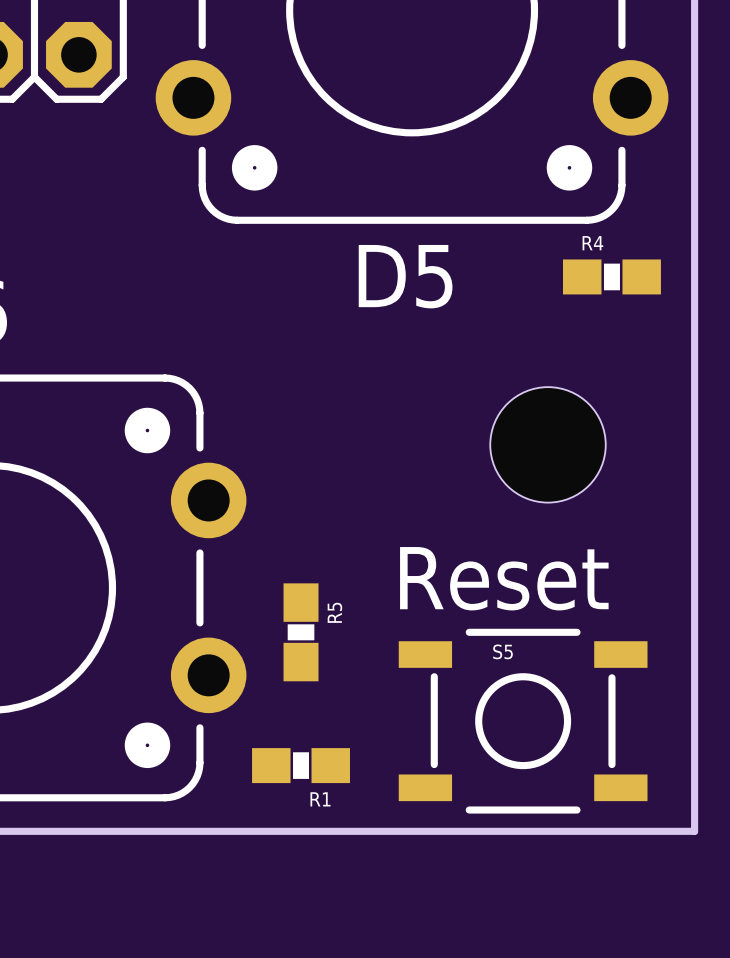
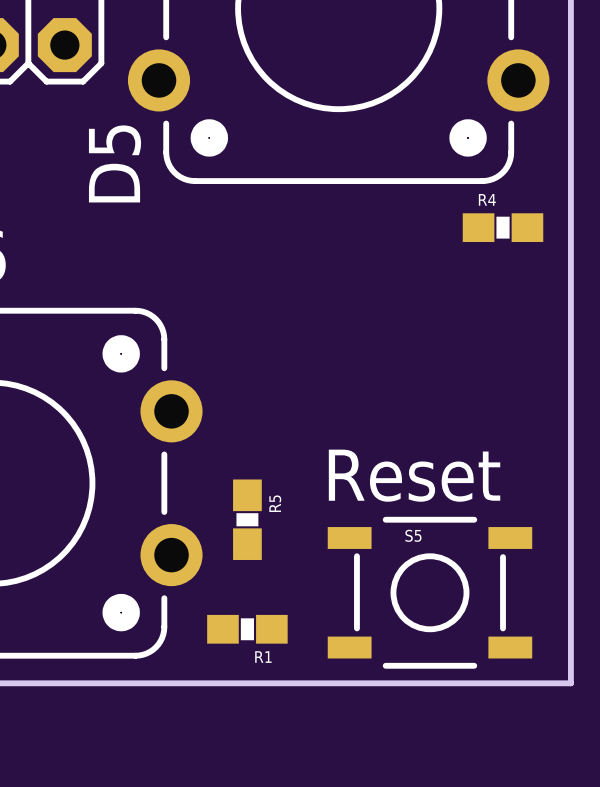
text rotation: 0° (405, 276) -> 90° counterclockwise (115, 163)
text position: D5 (405, 276) -> D5 (115, 163)
part: (548, 444) -> none

